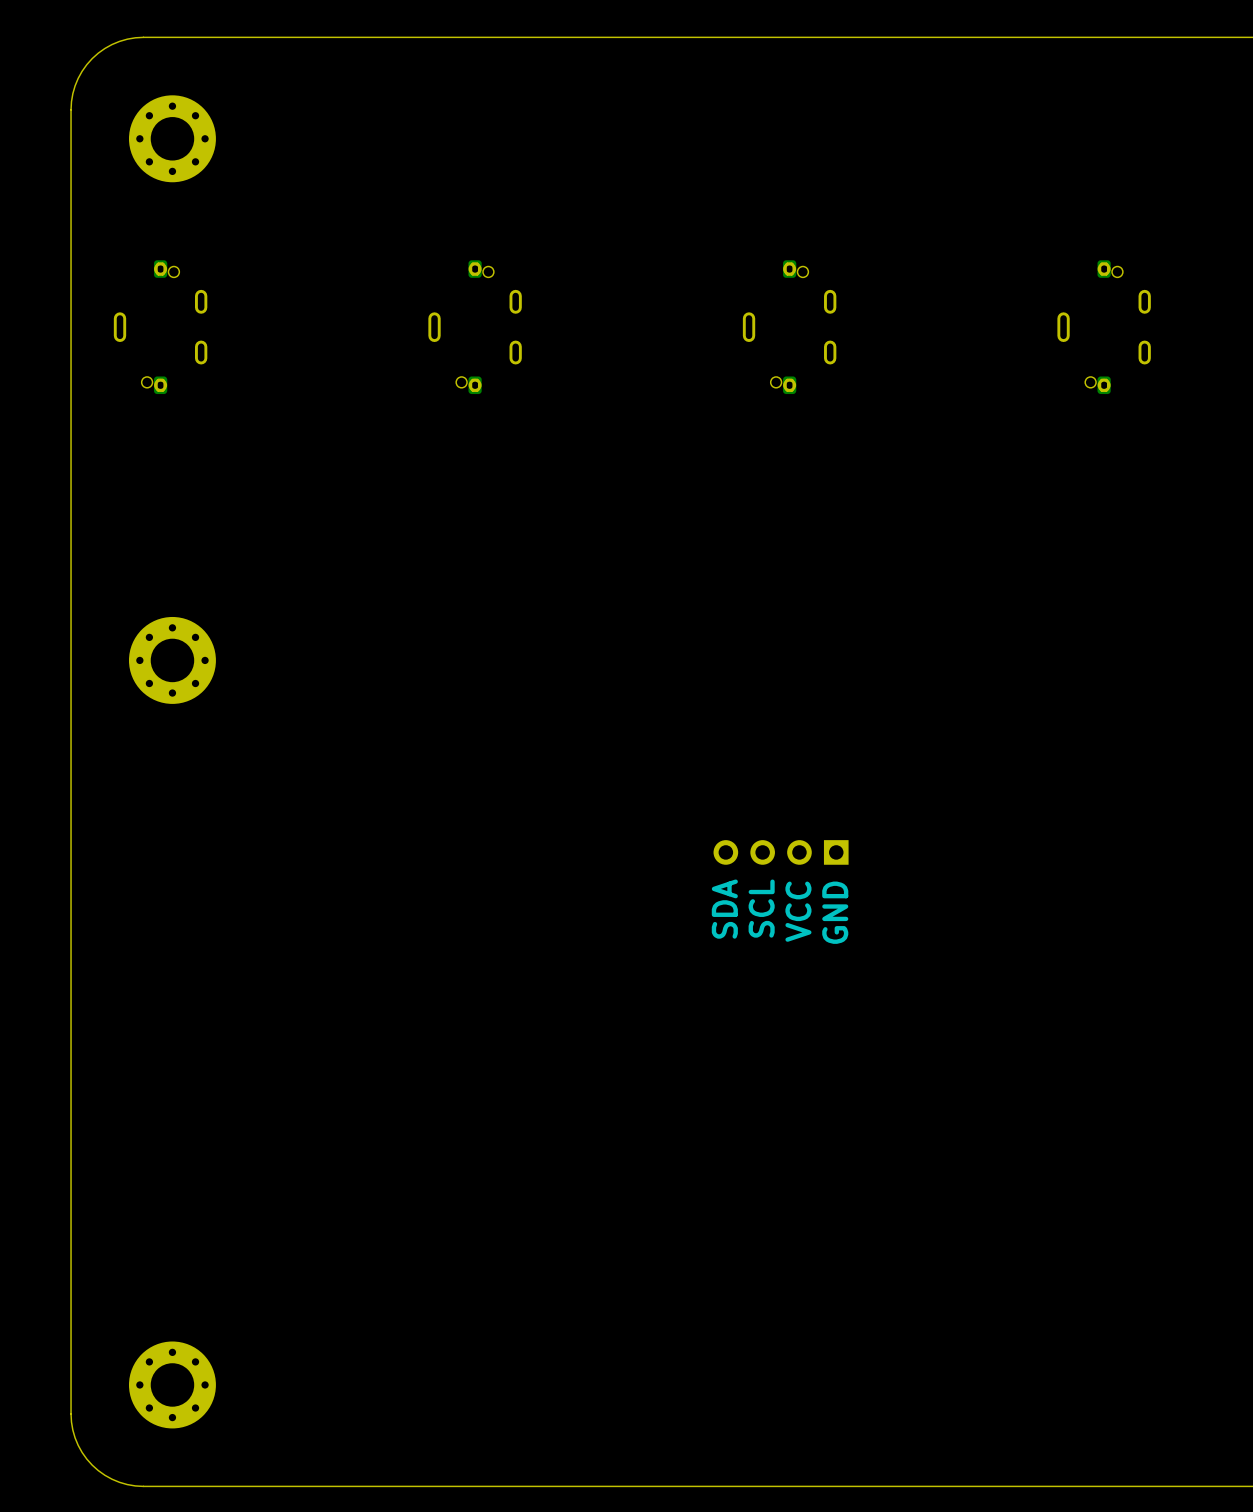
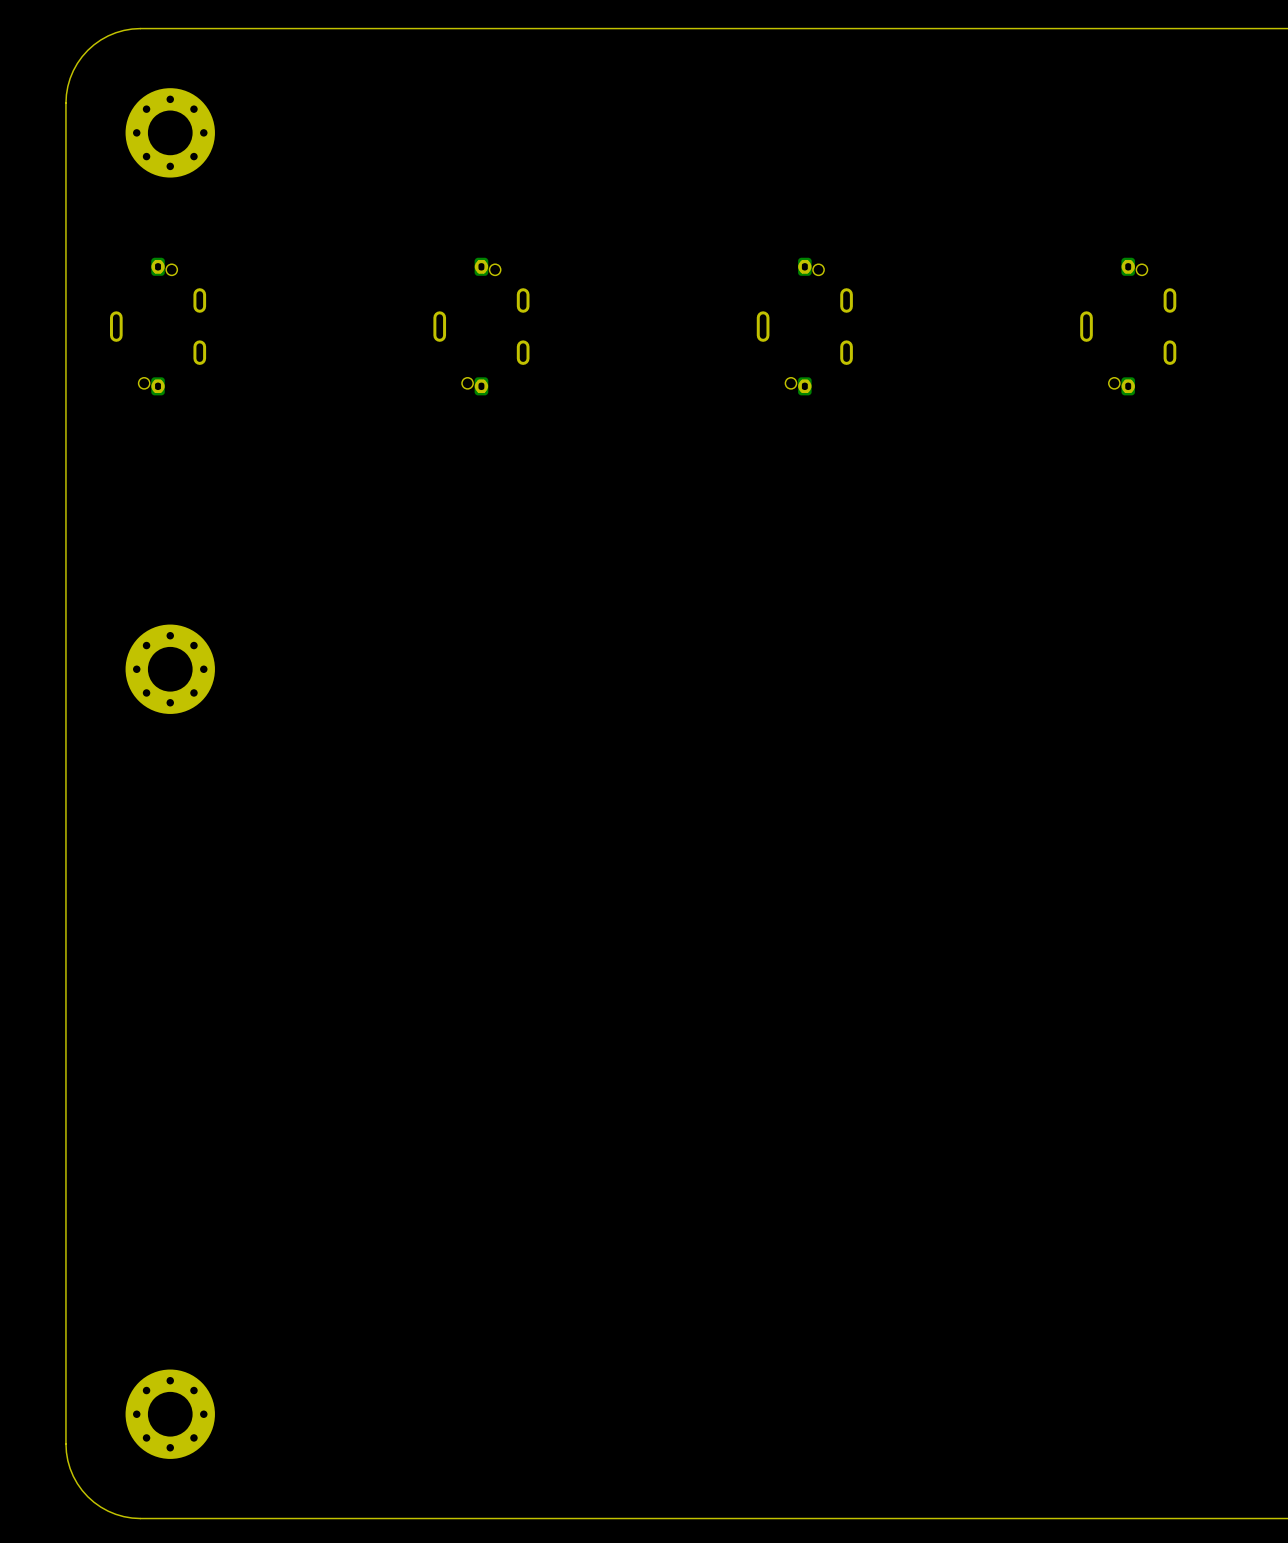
part: (781, 852) -> none

